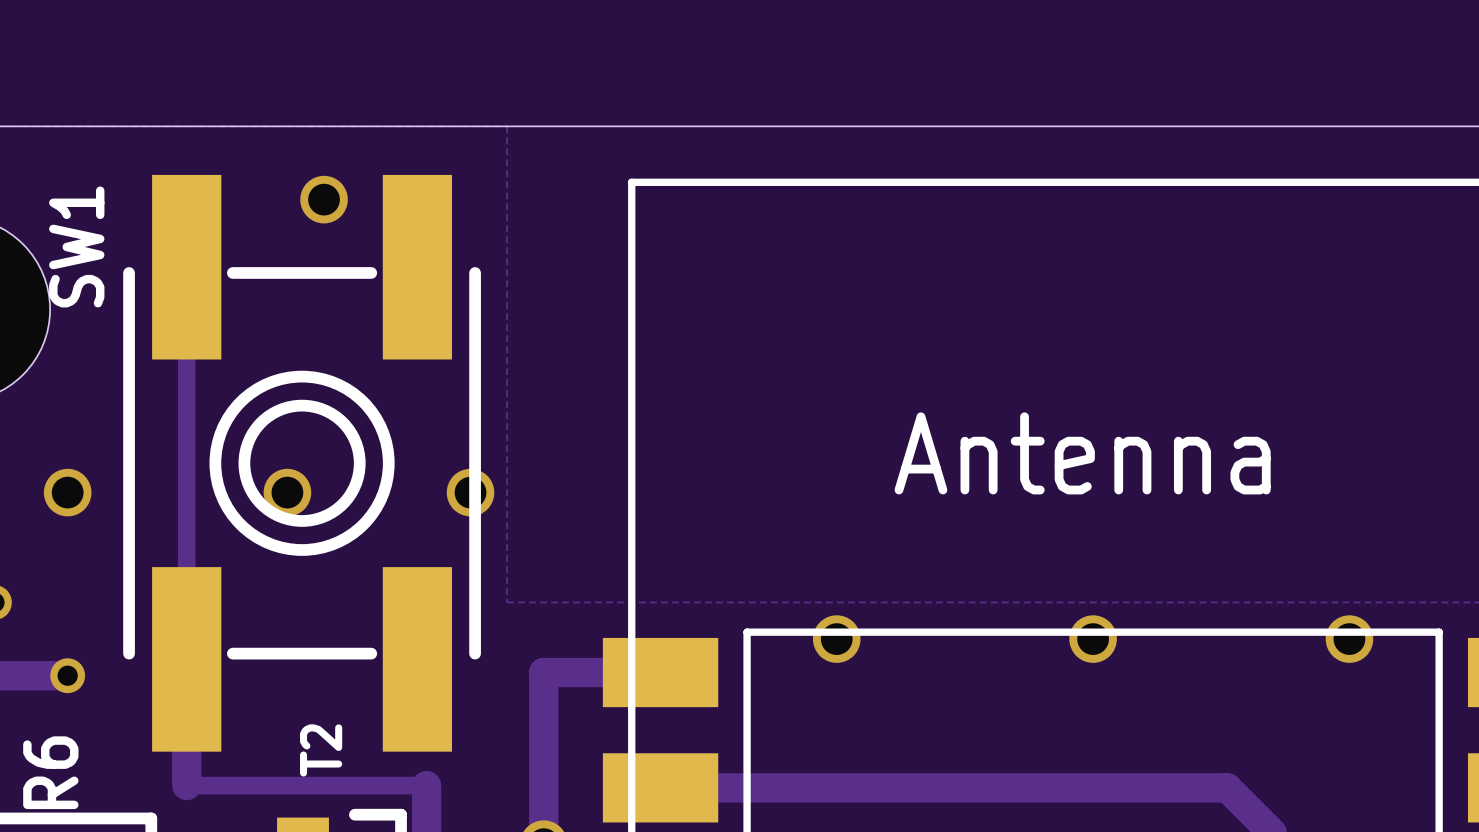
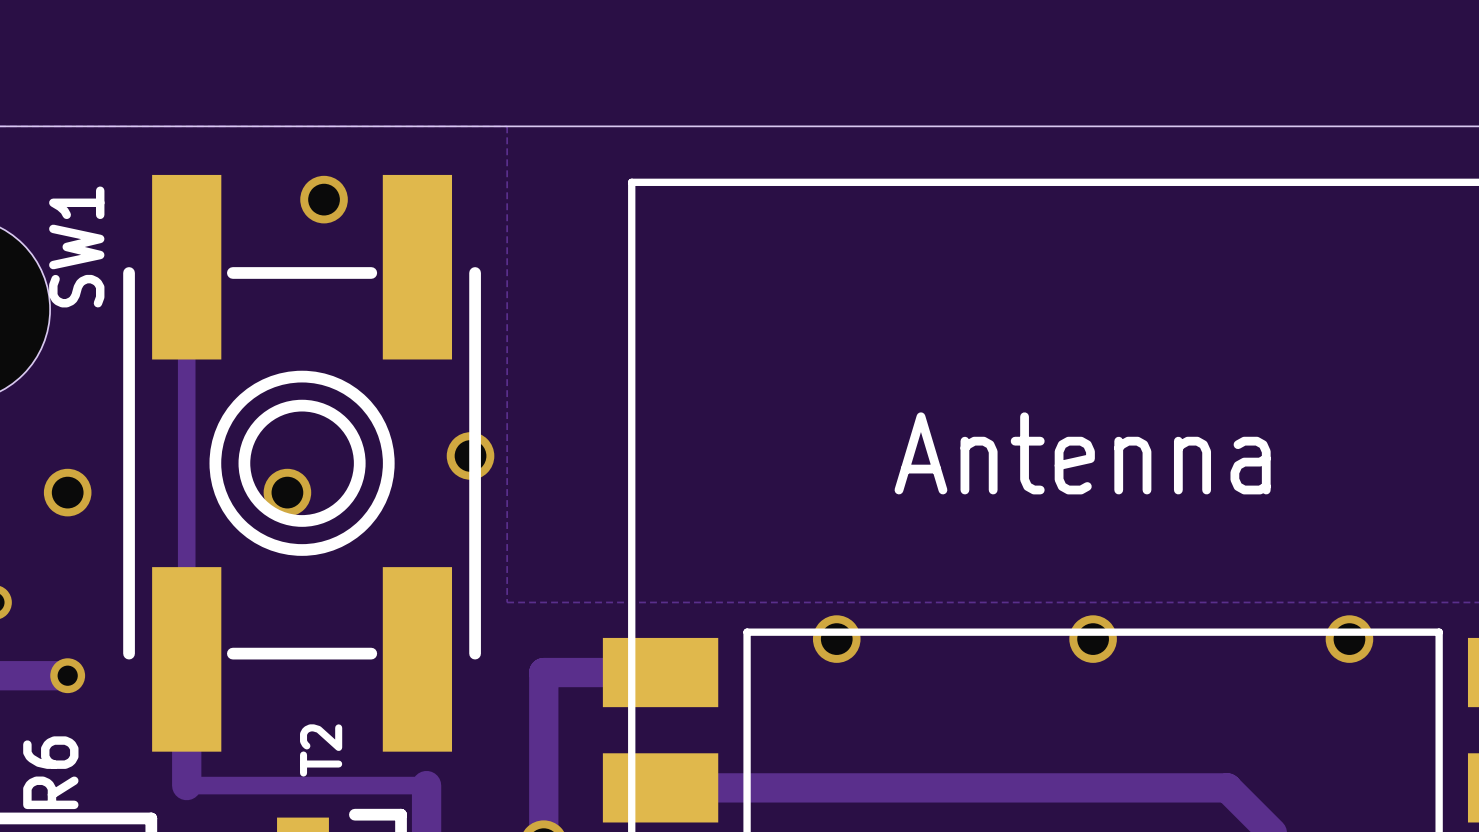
via position: (470, 492) -> (470, 455)

